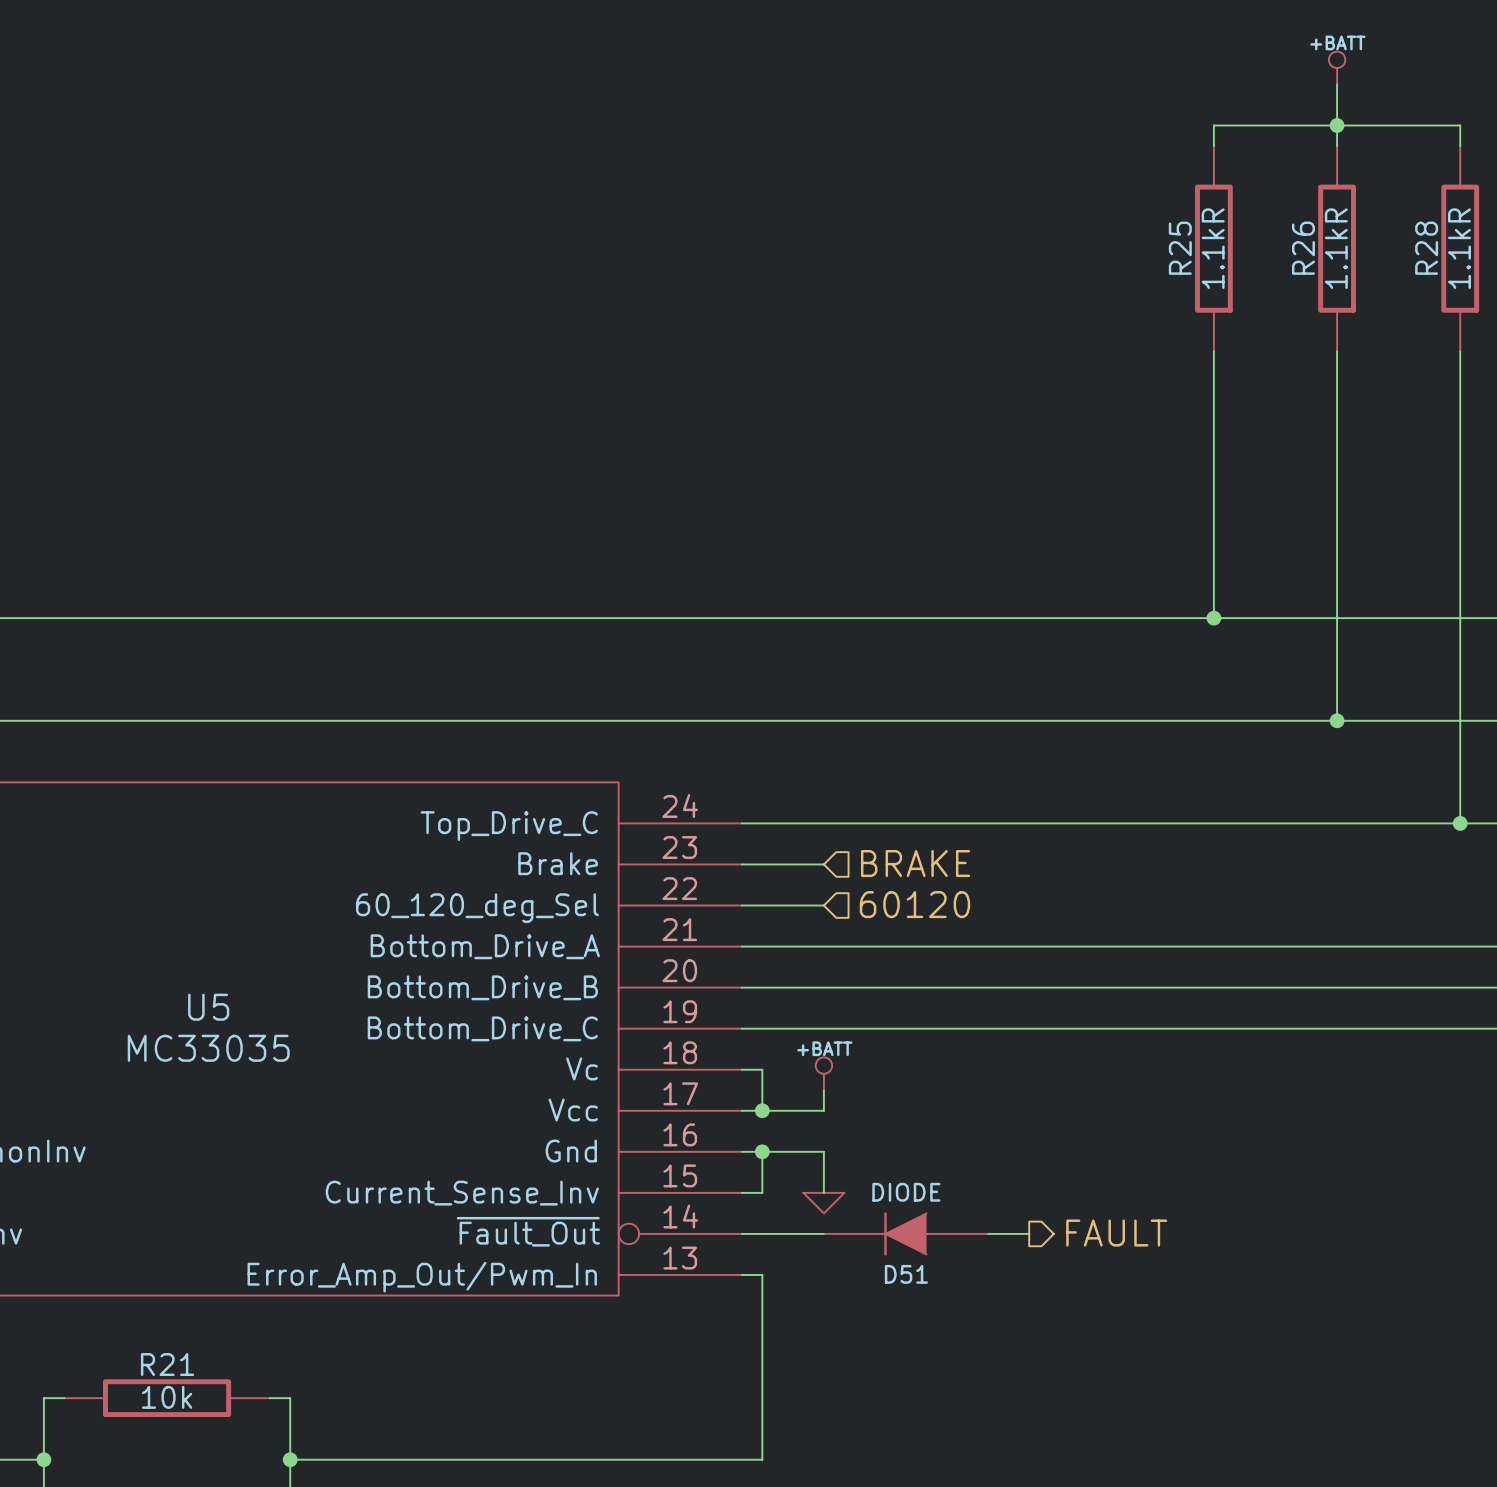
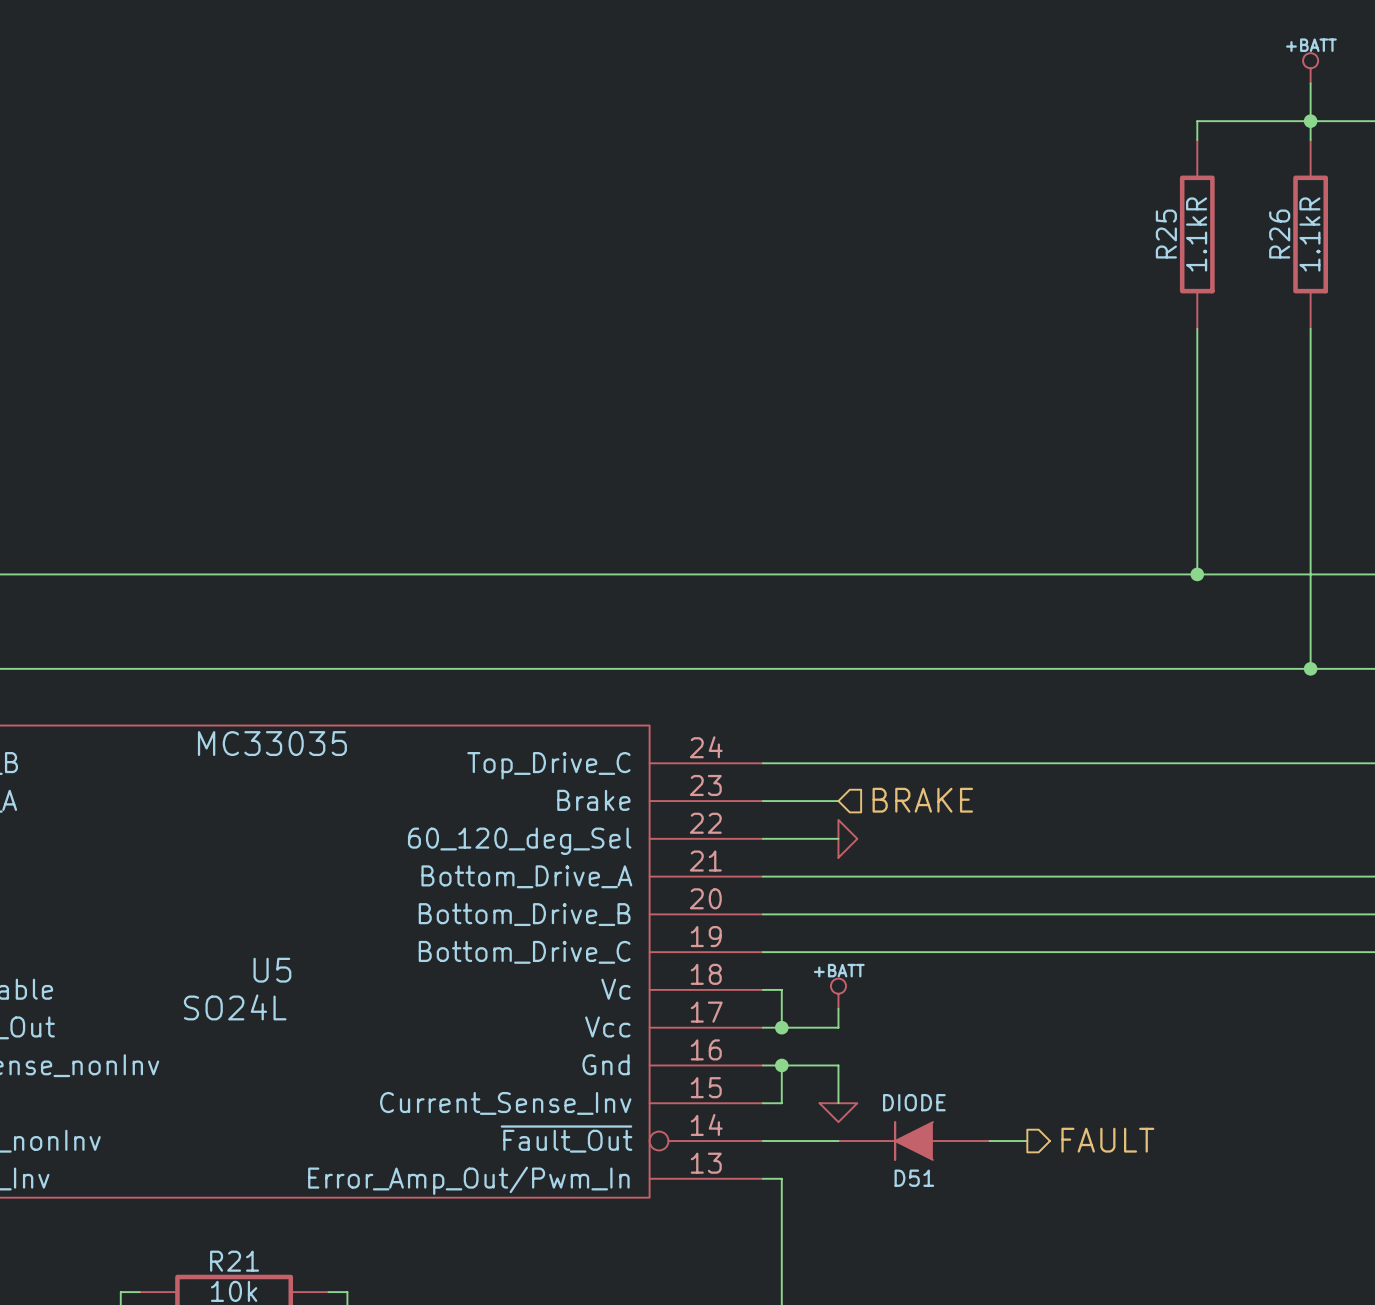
hierarchical label: 60120 (914, 904) -> none
power symbol: none -> (847, 838)
U5 name position: U5 (208, 1007) -> U5 (272, 970)
U5 value position: MC33035 (208, 1048) -> MC33035 (272, 743)
U5 text: none -> SO24L (235, 1007)

